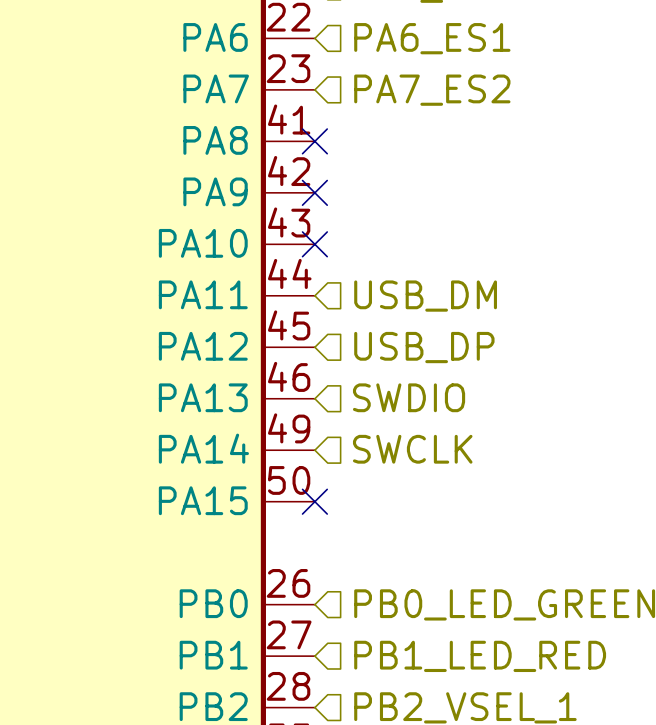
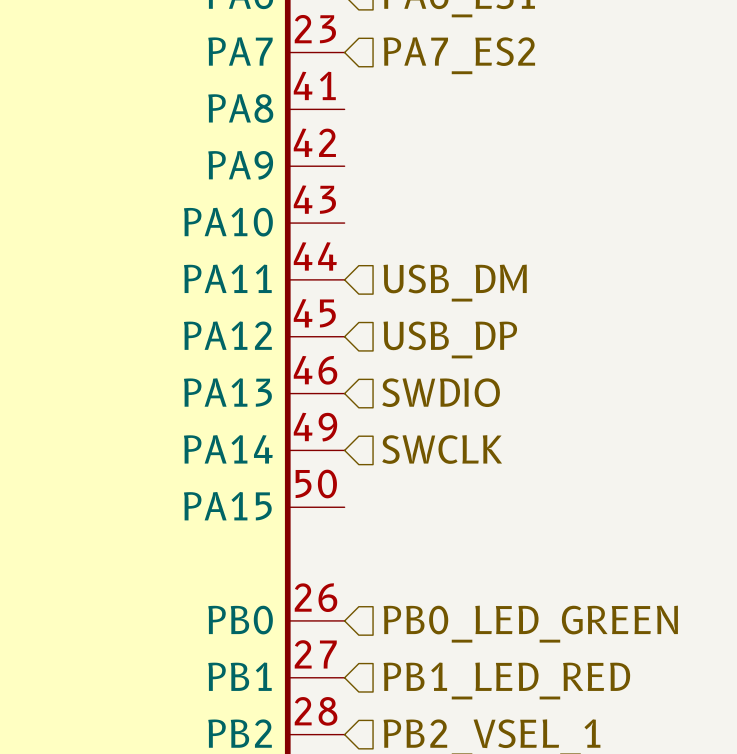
no-connect mark: (314, 141) -> none
no-connect mark: (314, 192) -> none
no-connect mark: (314, 244) -> none
no-connect mark: (314, 501) -> none

